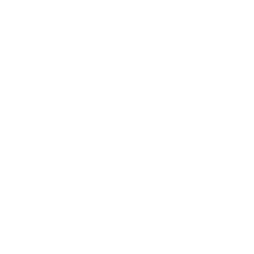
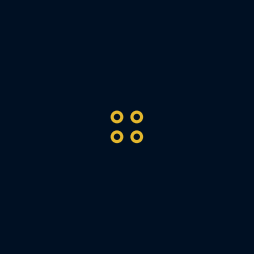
part: none -> (126, 126)

